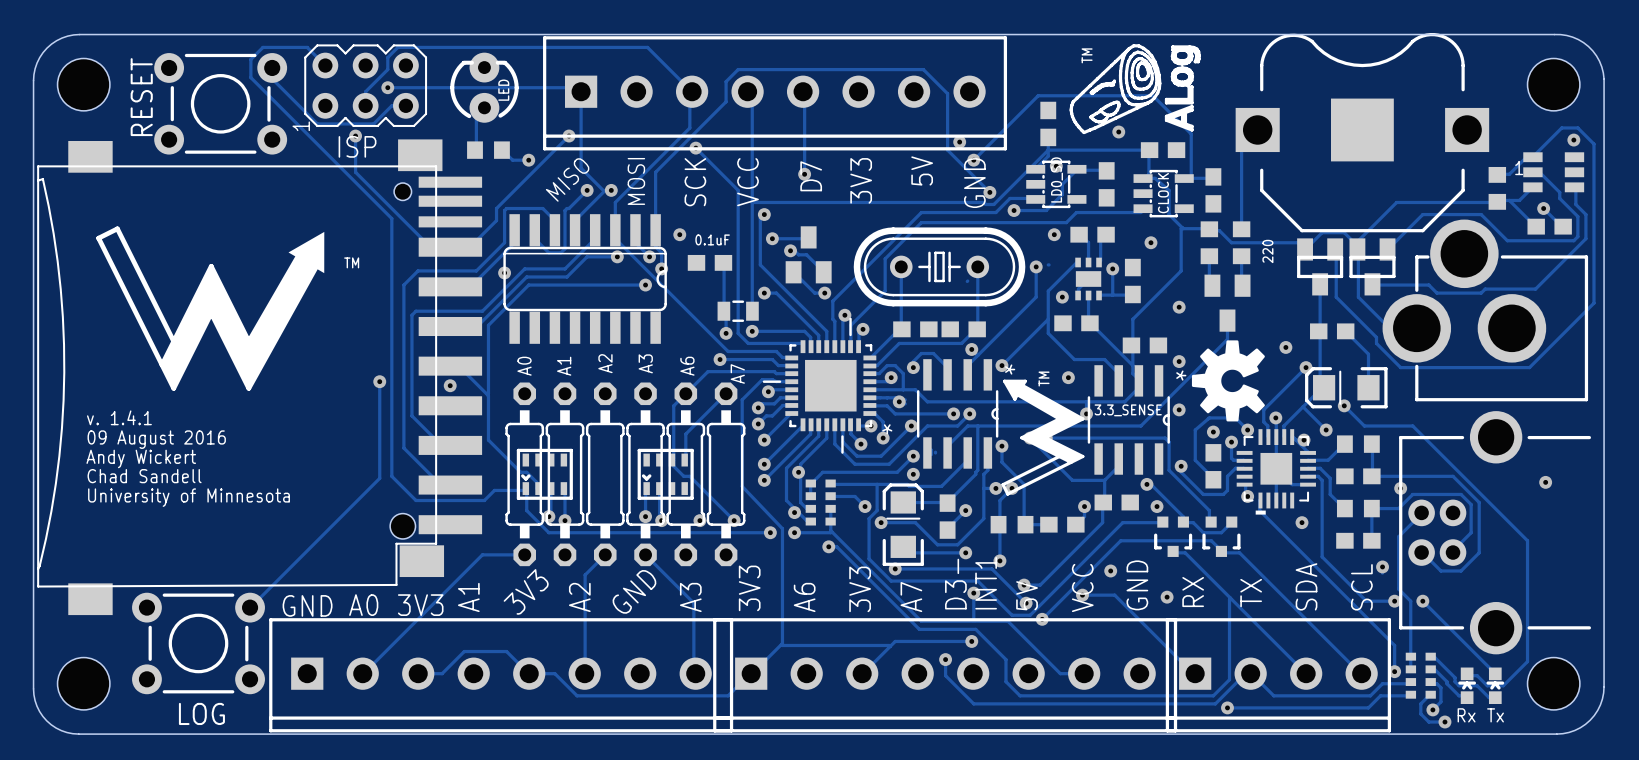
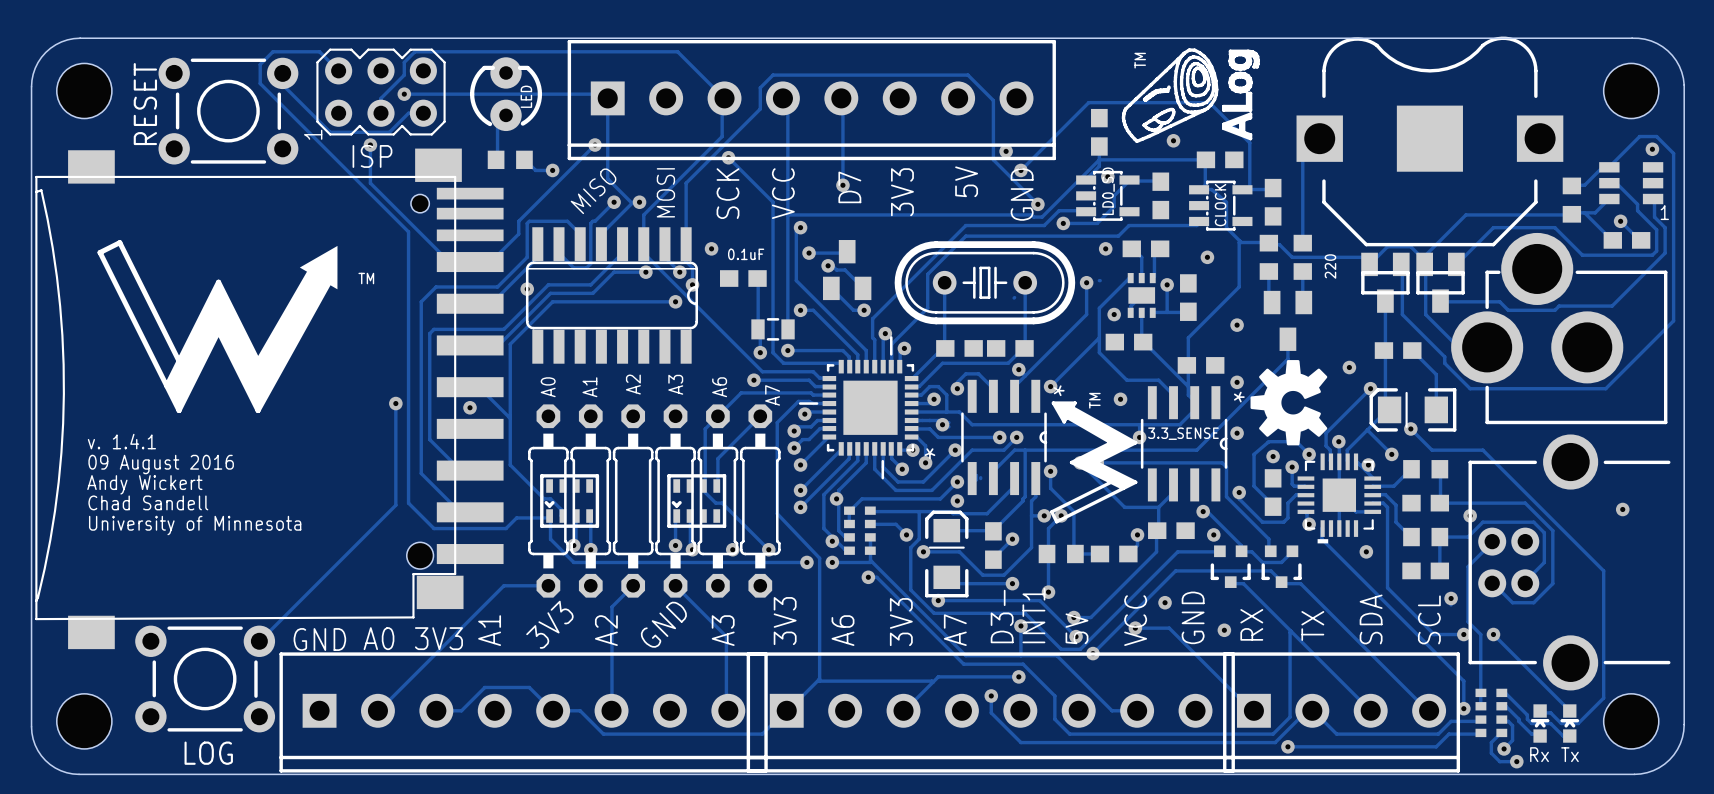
text position: 1 (1519, 168) -> 1 (1664, 212)

